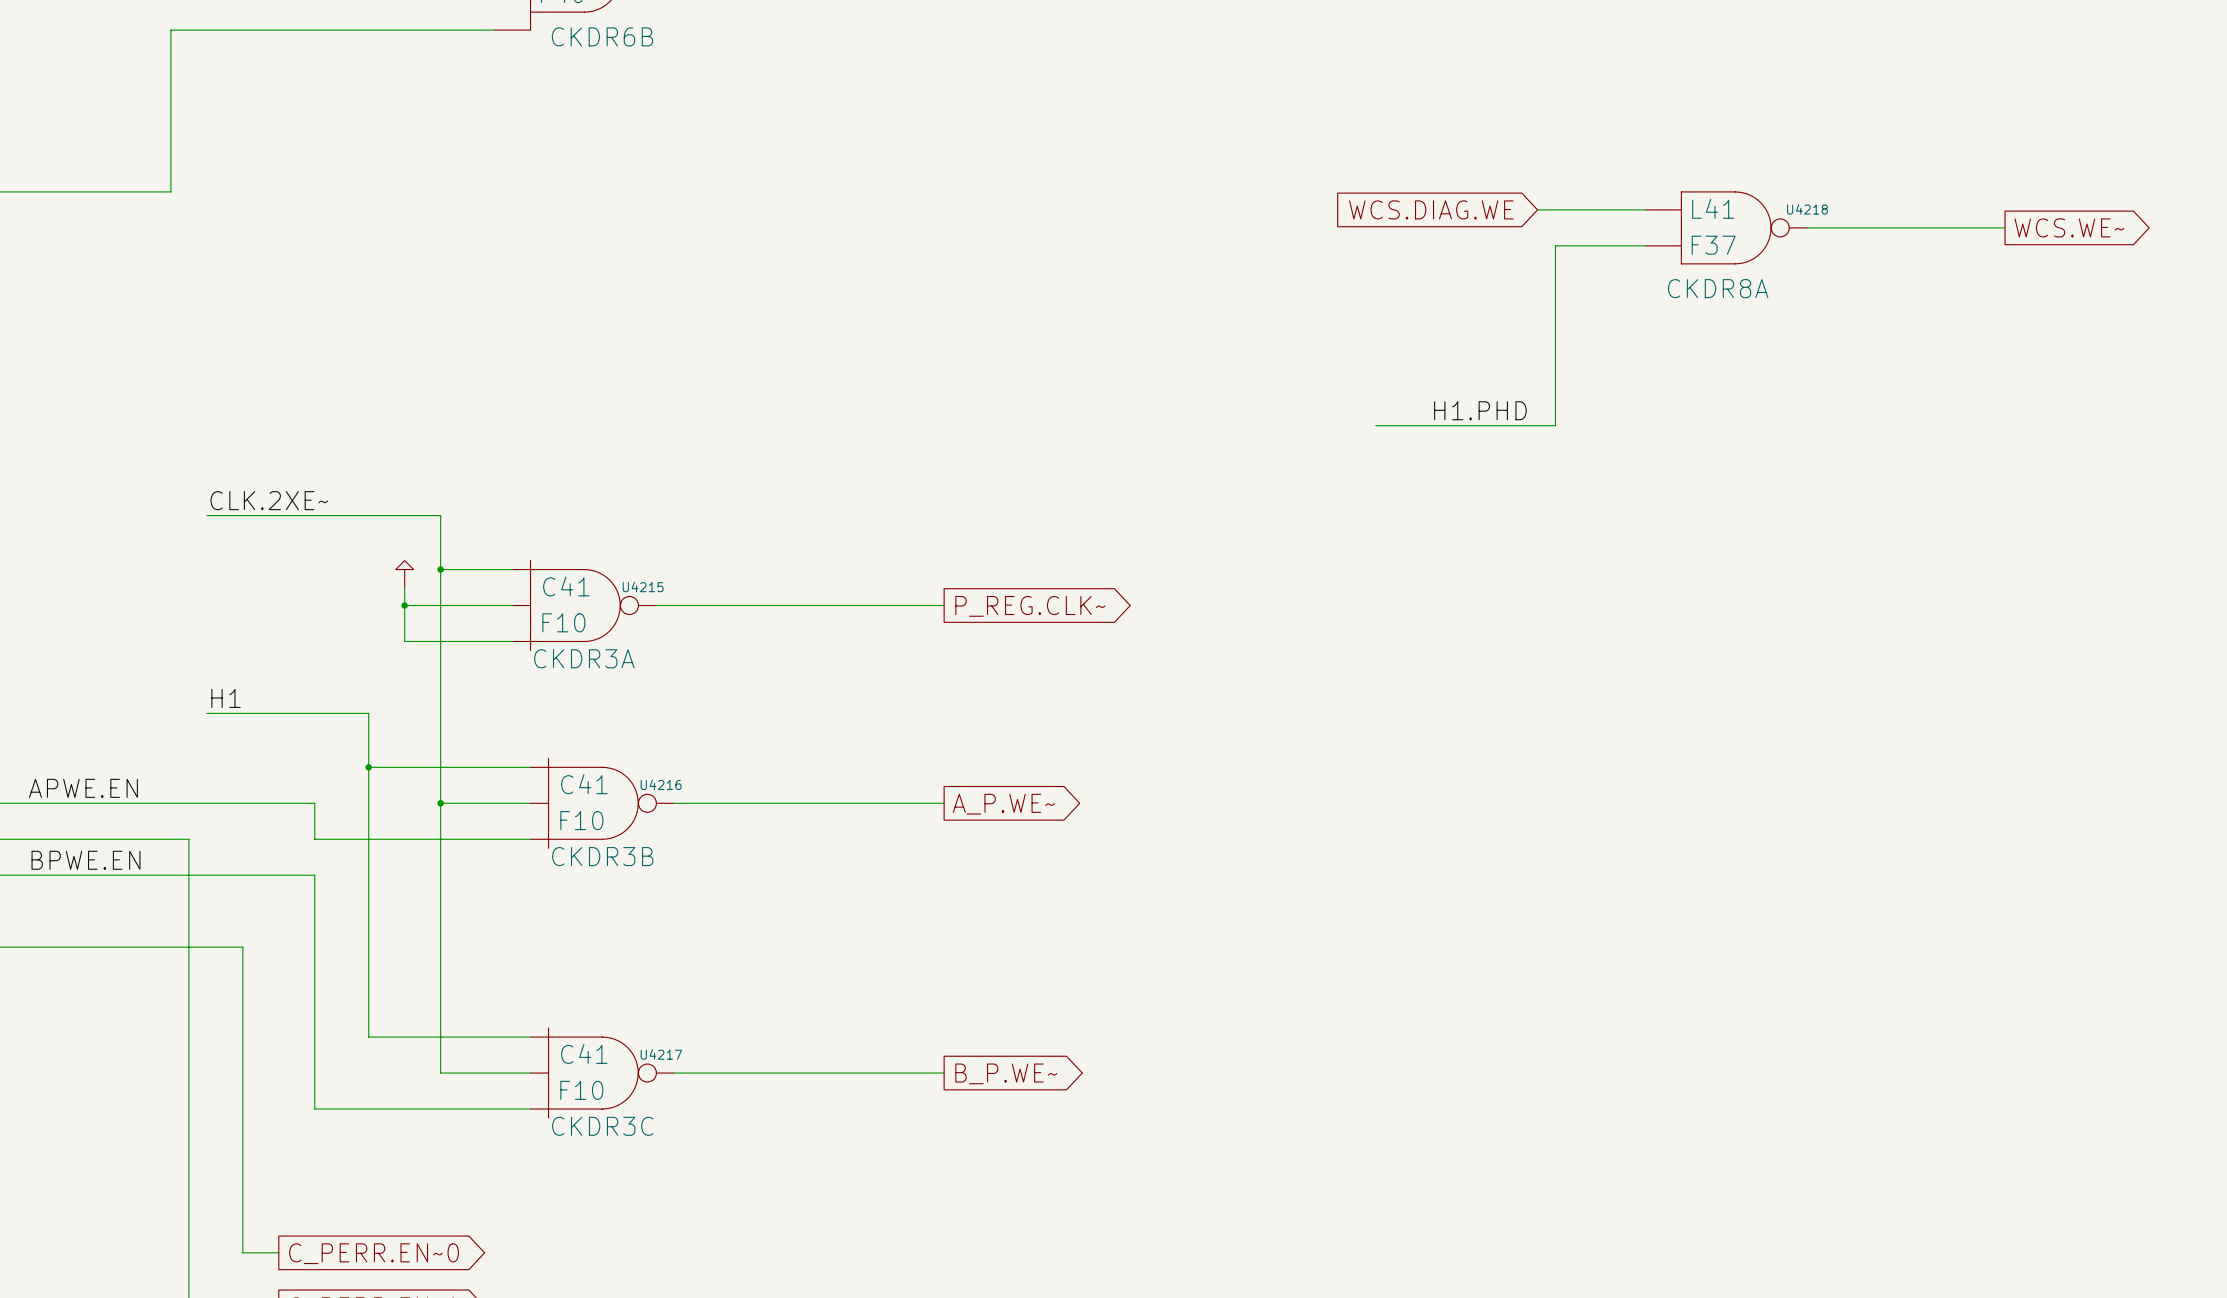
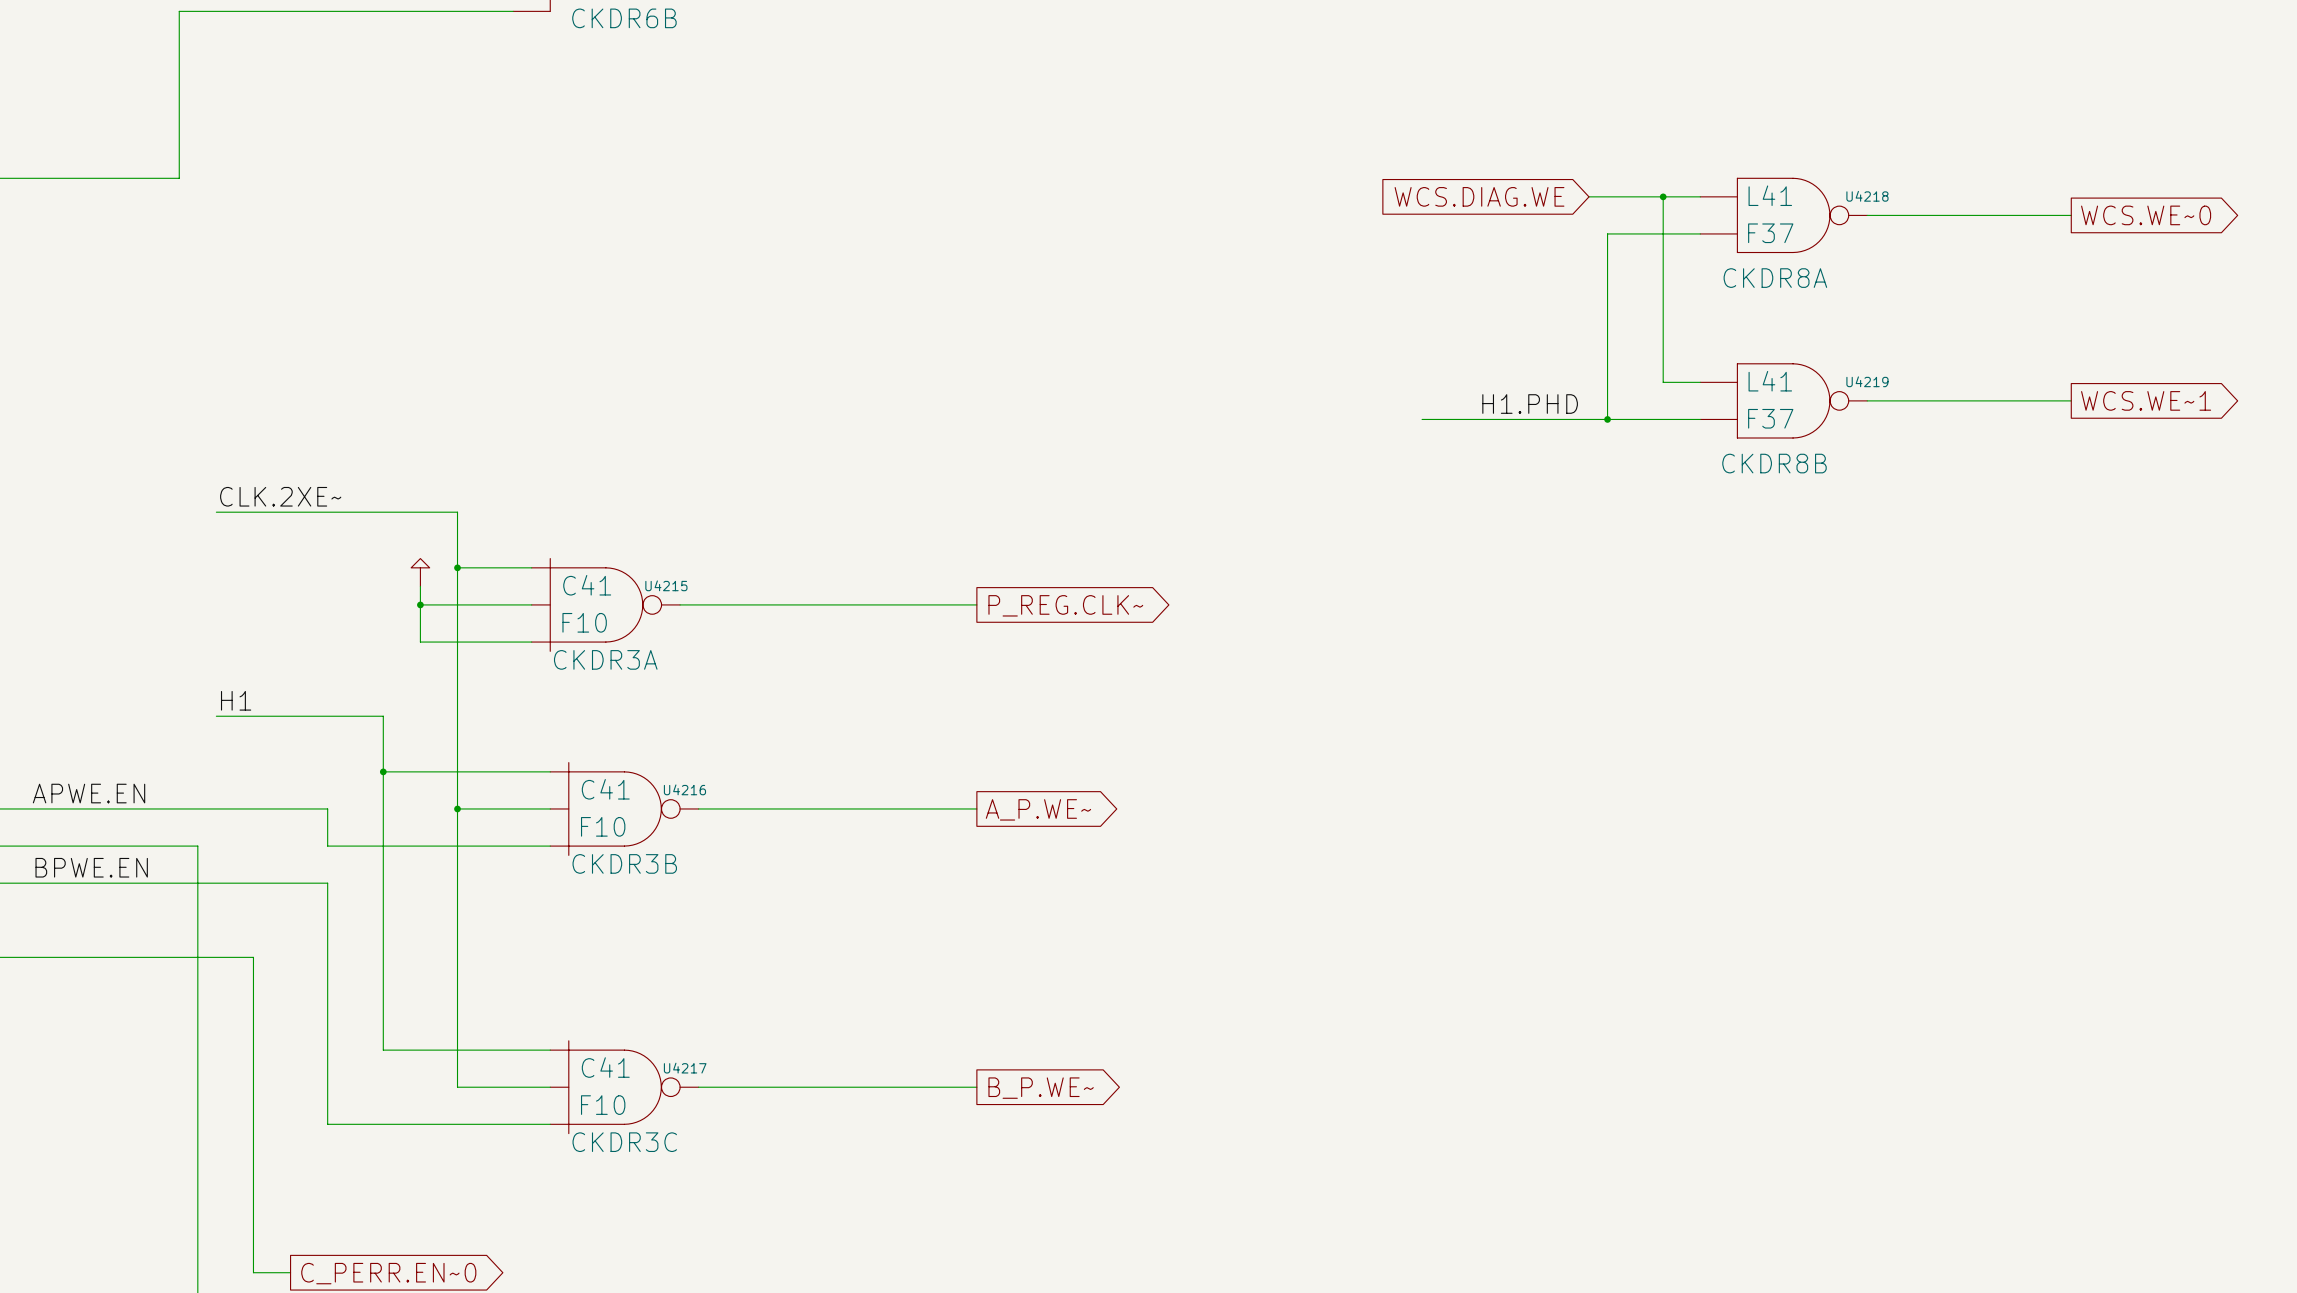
wire: none -> (1663, 196) (1663, 382) (1700, 382)
junction: none -> (1663, 196)
global label: WCS.WE~ (2069, 227) -> WCS.WE~0 (2146, 215)
U4219: none -> F37 (1783, 400)
wire: none -> (1867, 400) (2071, 400)
global label: none -> WCS.WE~1 (2146, 400)
wire: none -> (1607, 419) (1700, 419)
junction: none -> (1607, 419)

